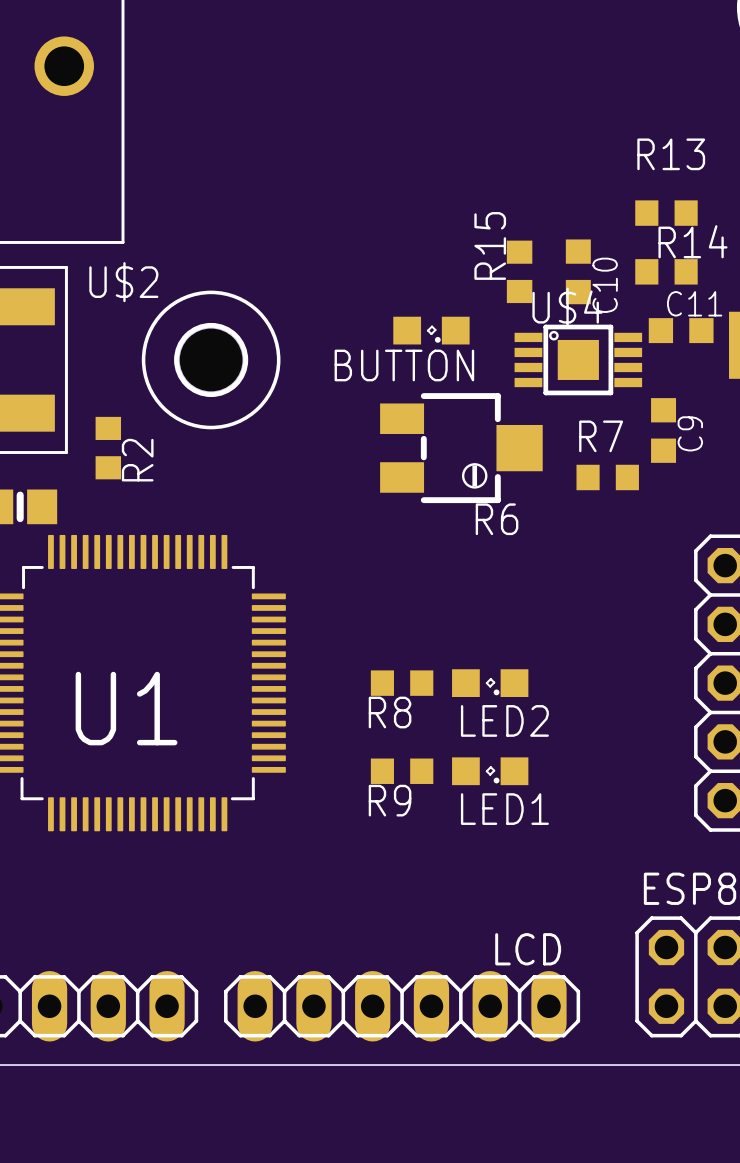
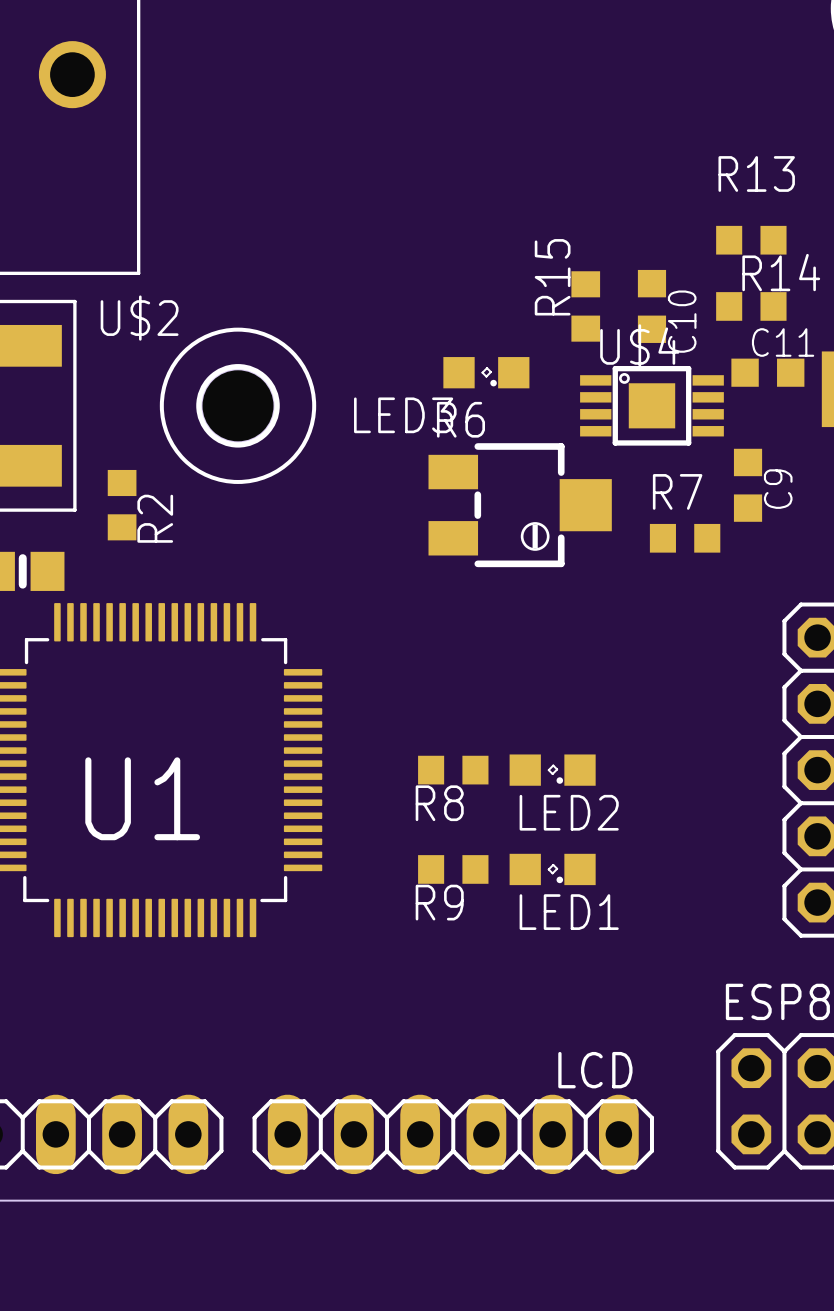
BUTTON name: BUTTON (404, 365) -> LED3 (403, 415)
R6 name position: R6 (497, 519) -> R6 (460, 419)

